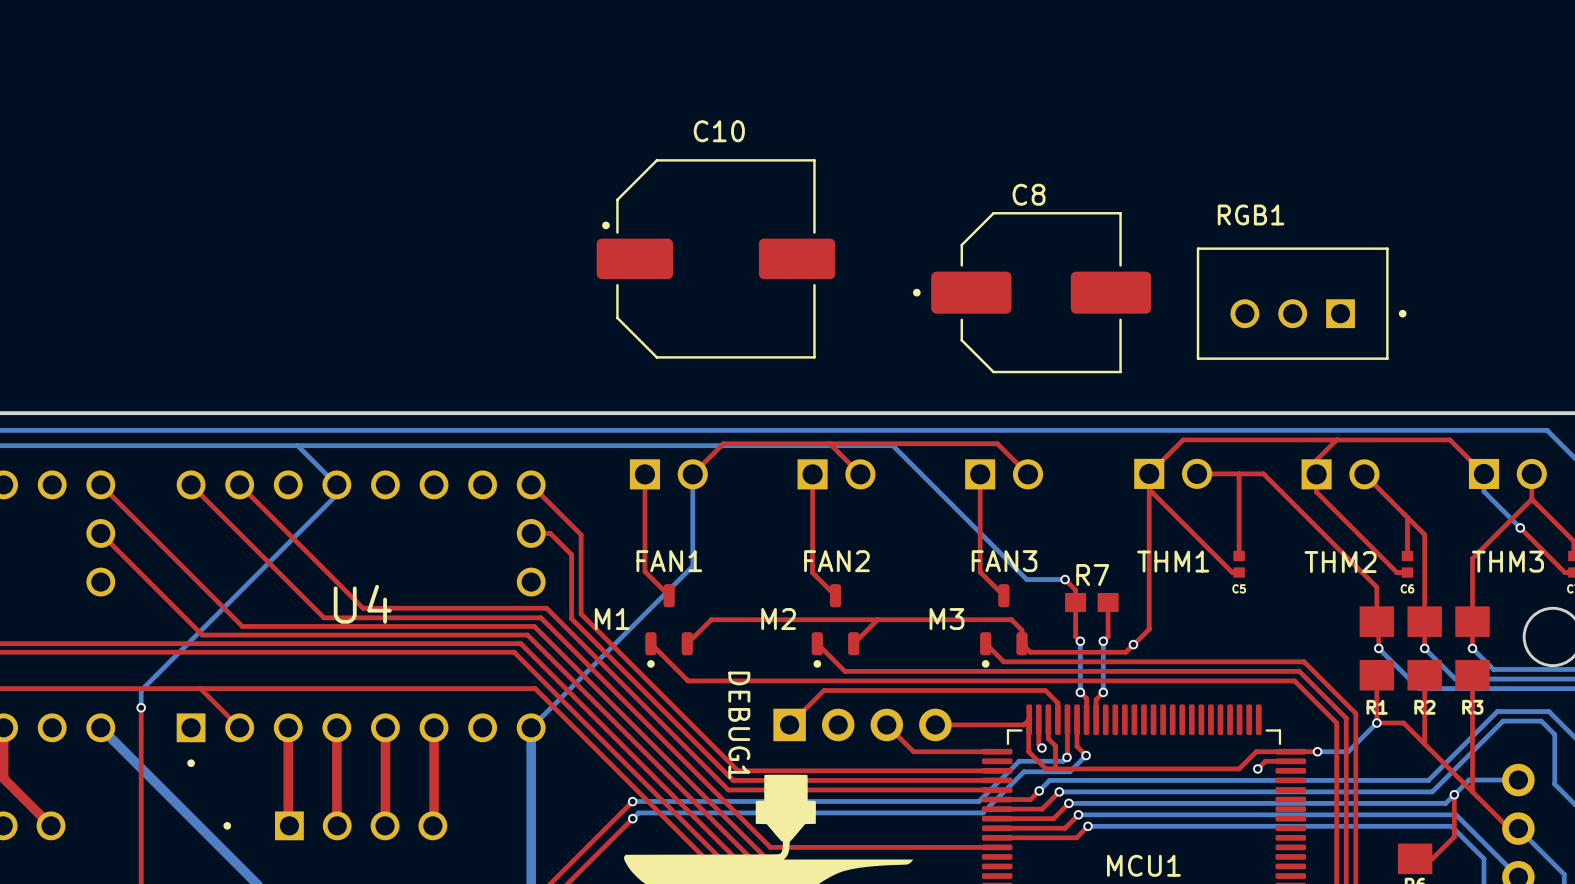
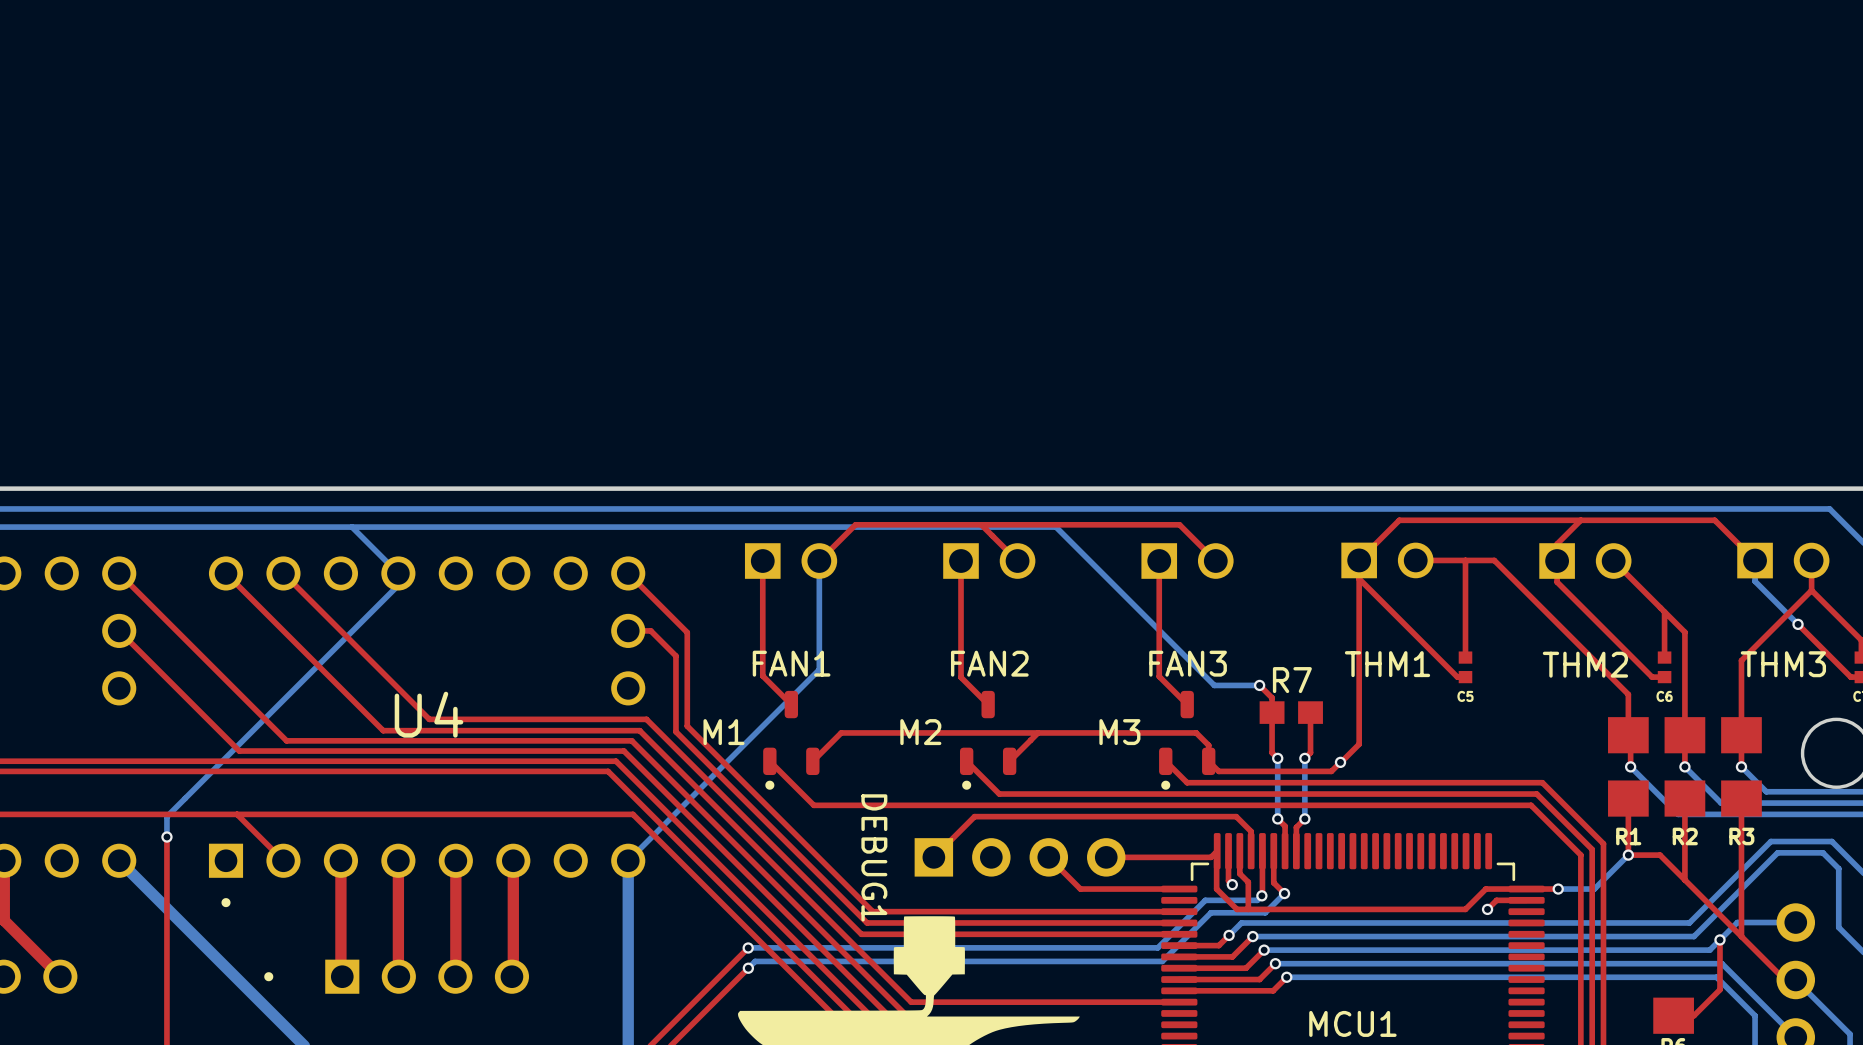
C10: (715, 258) -> none
C8: (1032, 292) -> none
RGB1: (1301, 303) -> none

